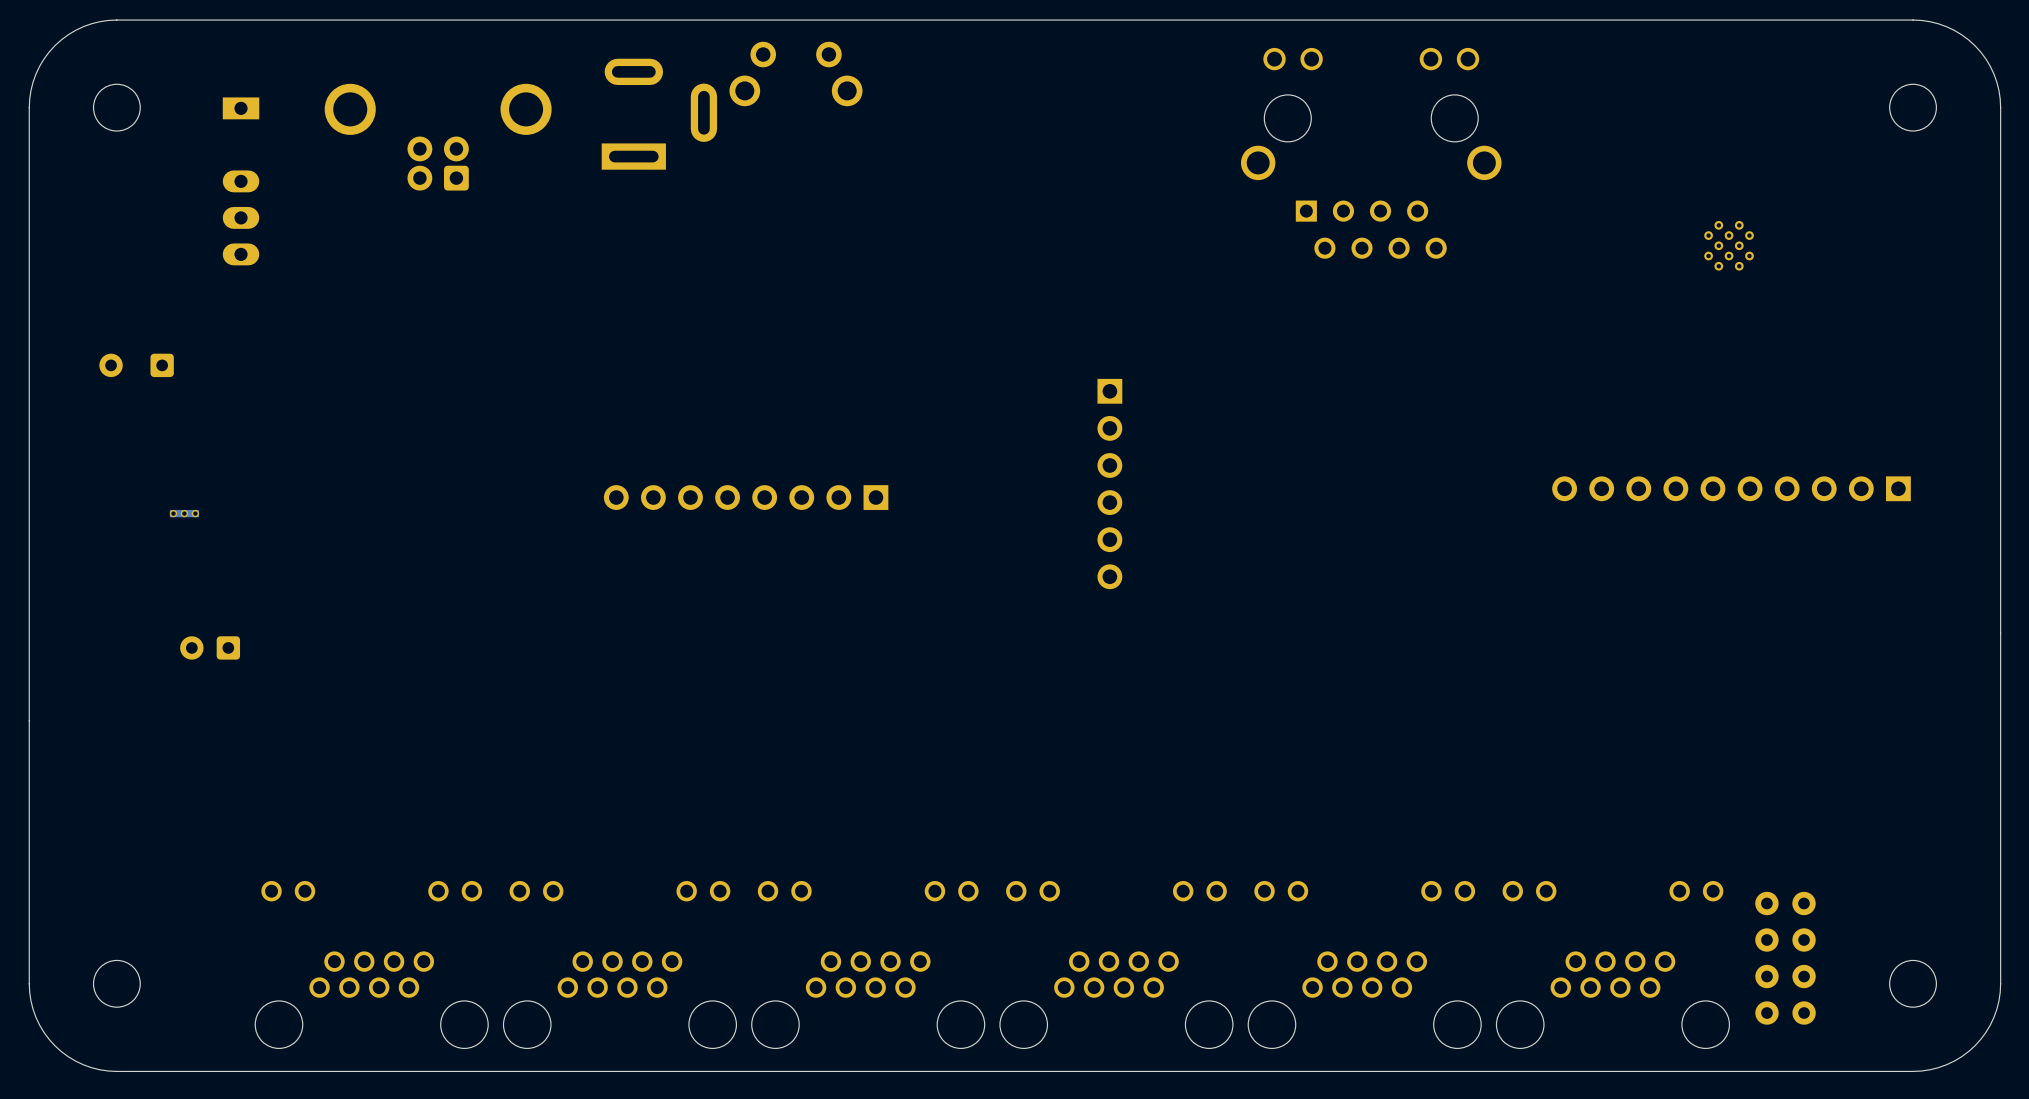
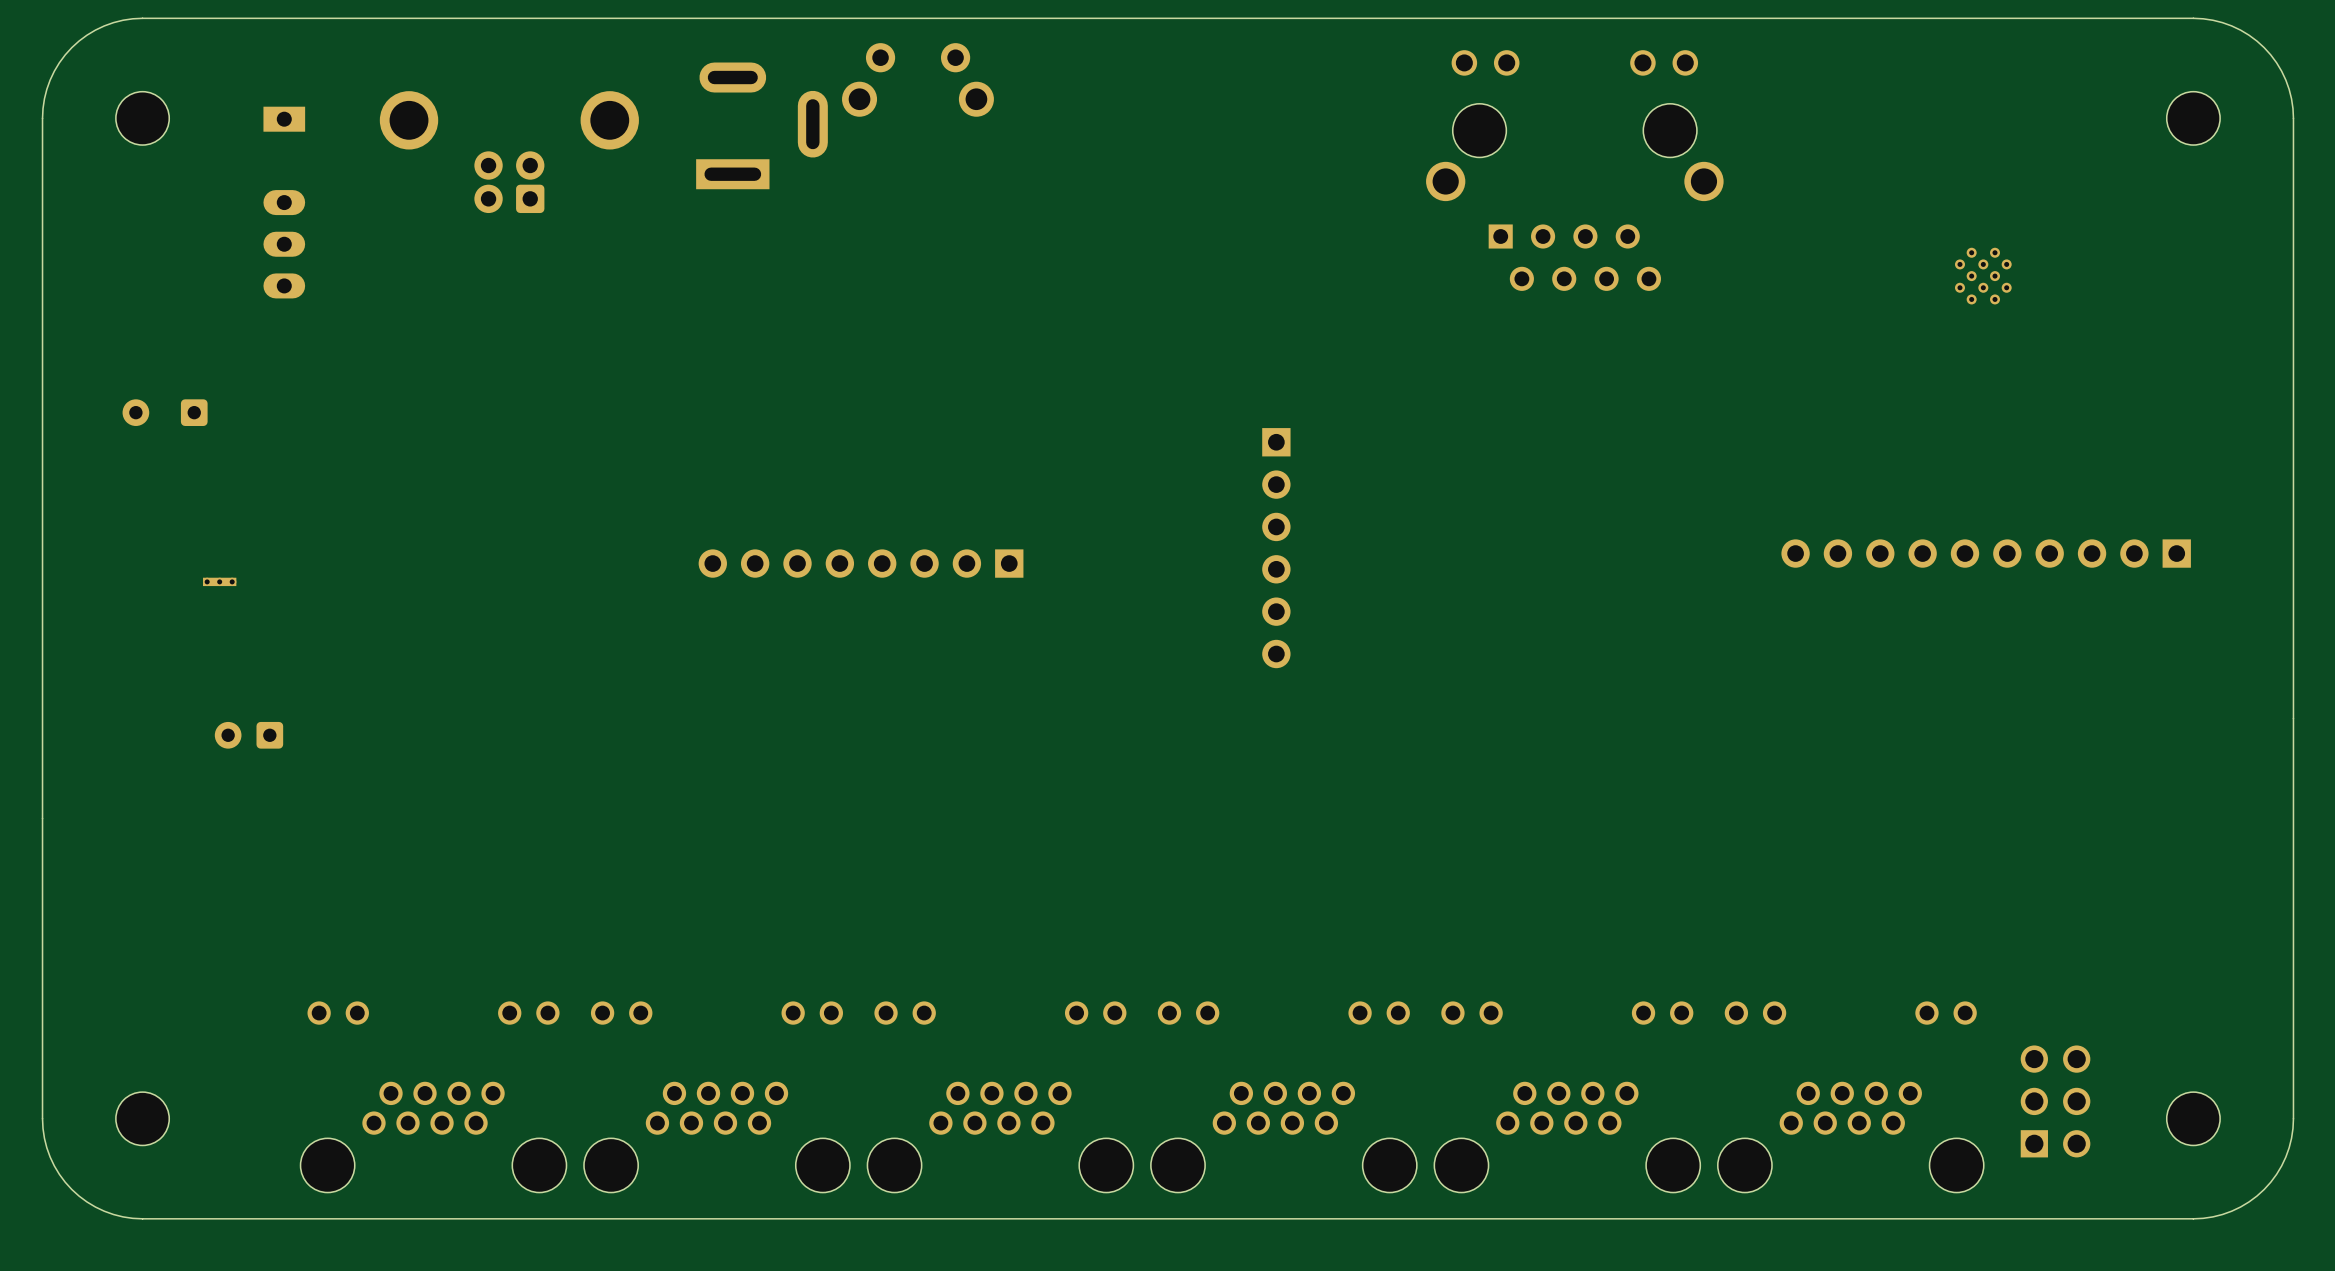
part footprint: [1755, 891, 1816, 1025] -> [2020, 1045, 2091, 1158]

